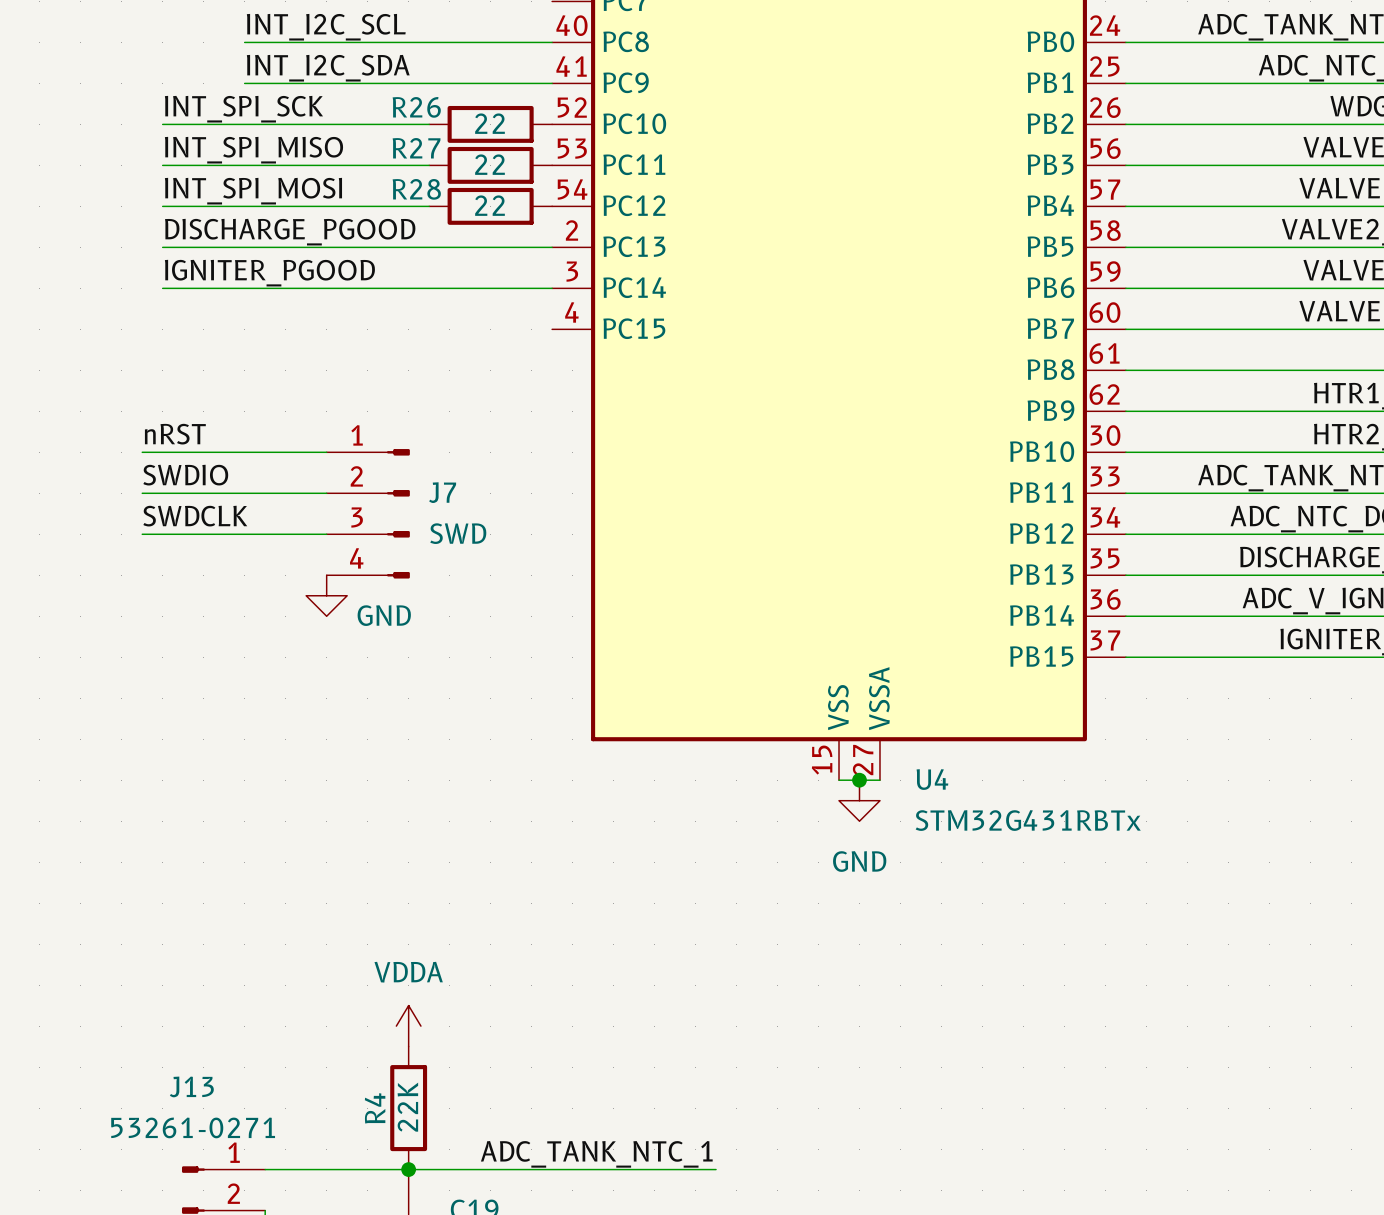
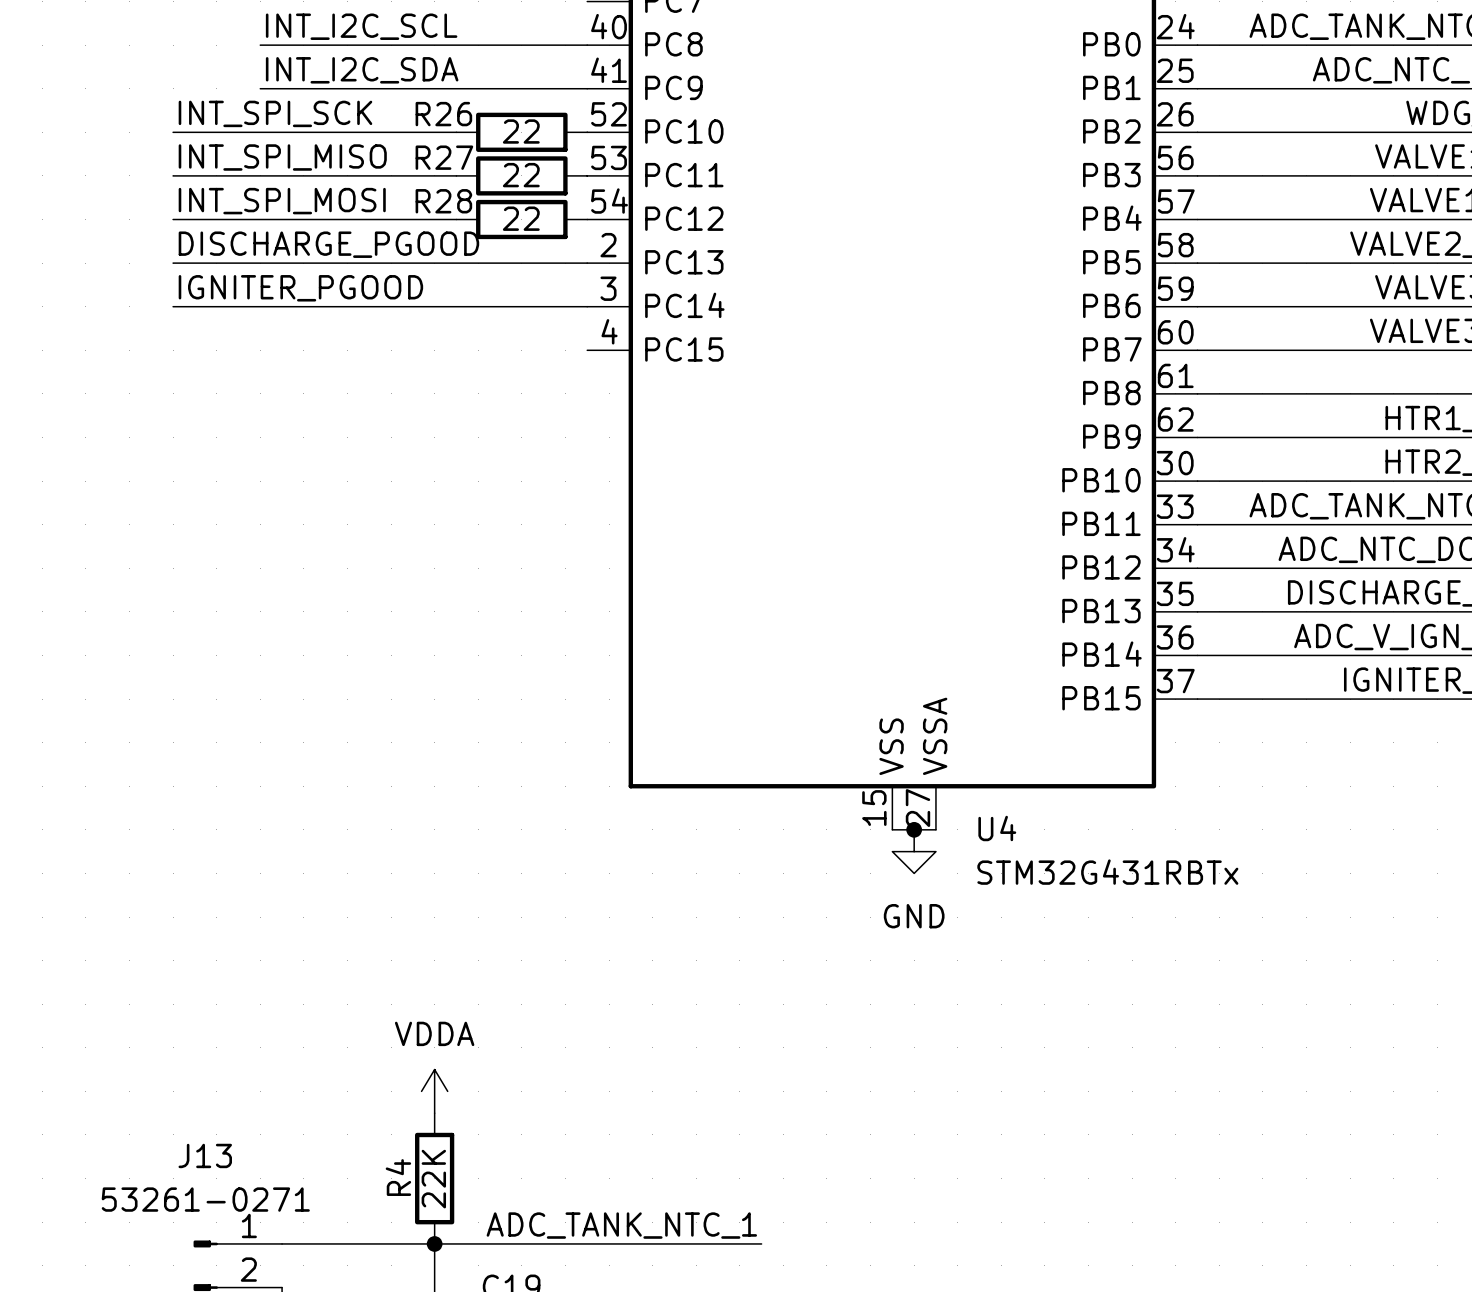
label: nRST (175, 434) -> none
wire: (142, 452) (326, 452) -> none
label: SWDIO (185, 475) -> none
wire: (142, 493) (326, 493) -> none
J7: SWD (368, 513) -> none
label: SWDCLK (195, 516) -> none
wire: (142, 534) (326, 534) -> none
power symbol: GND (326, 595) -> none

